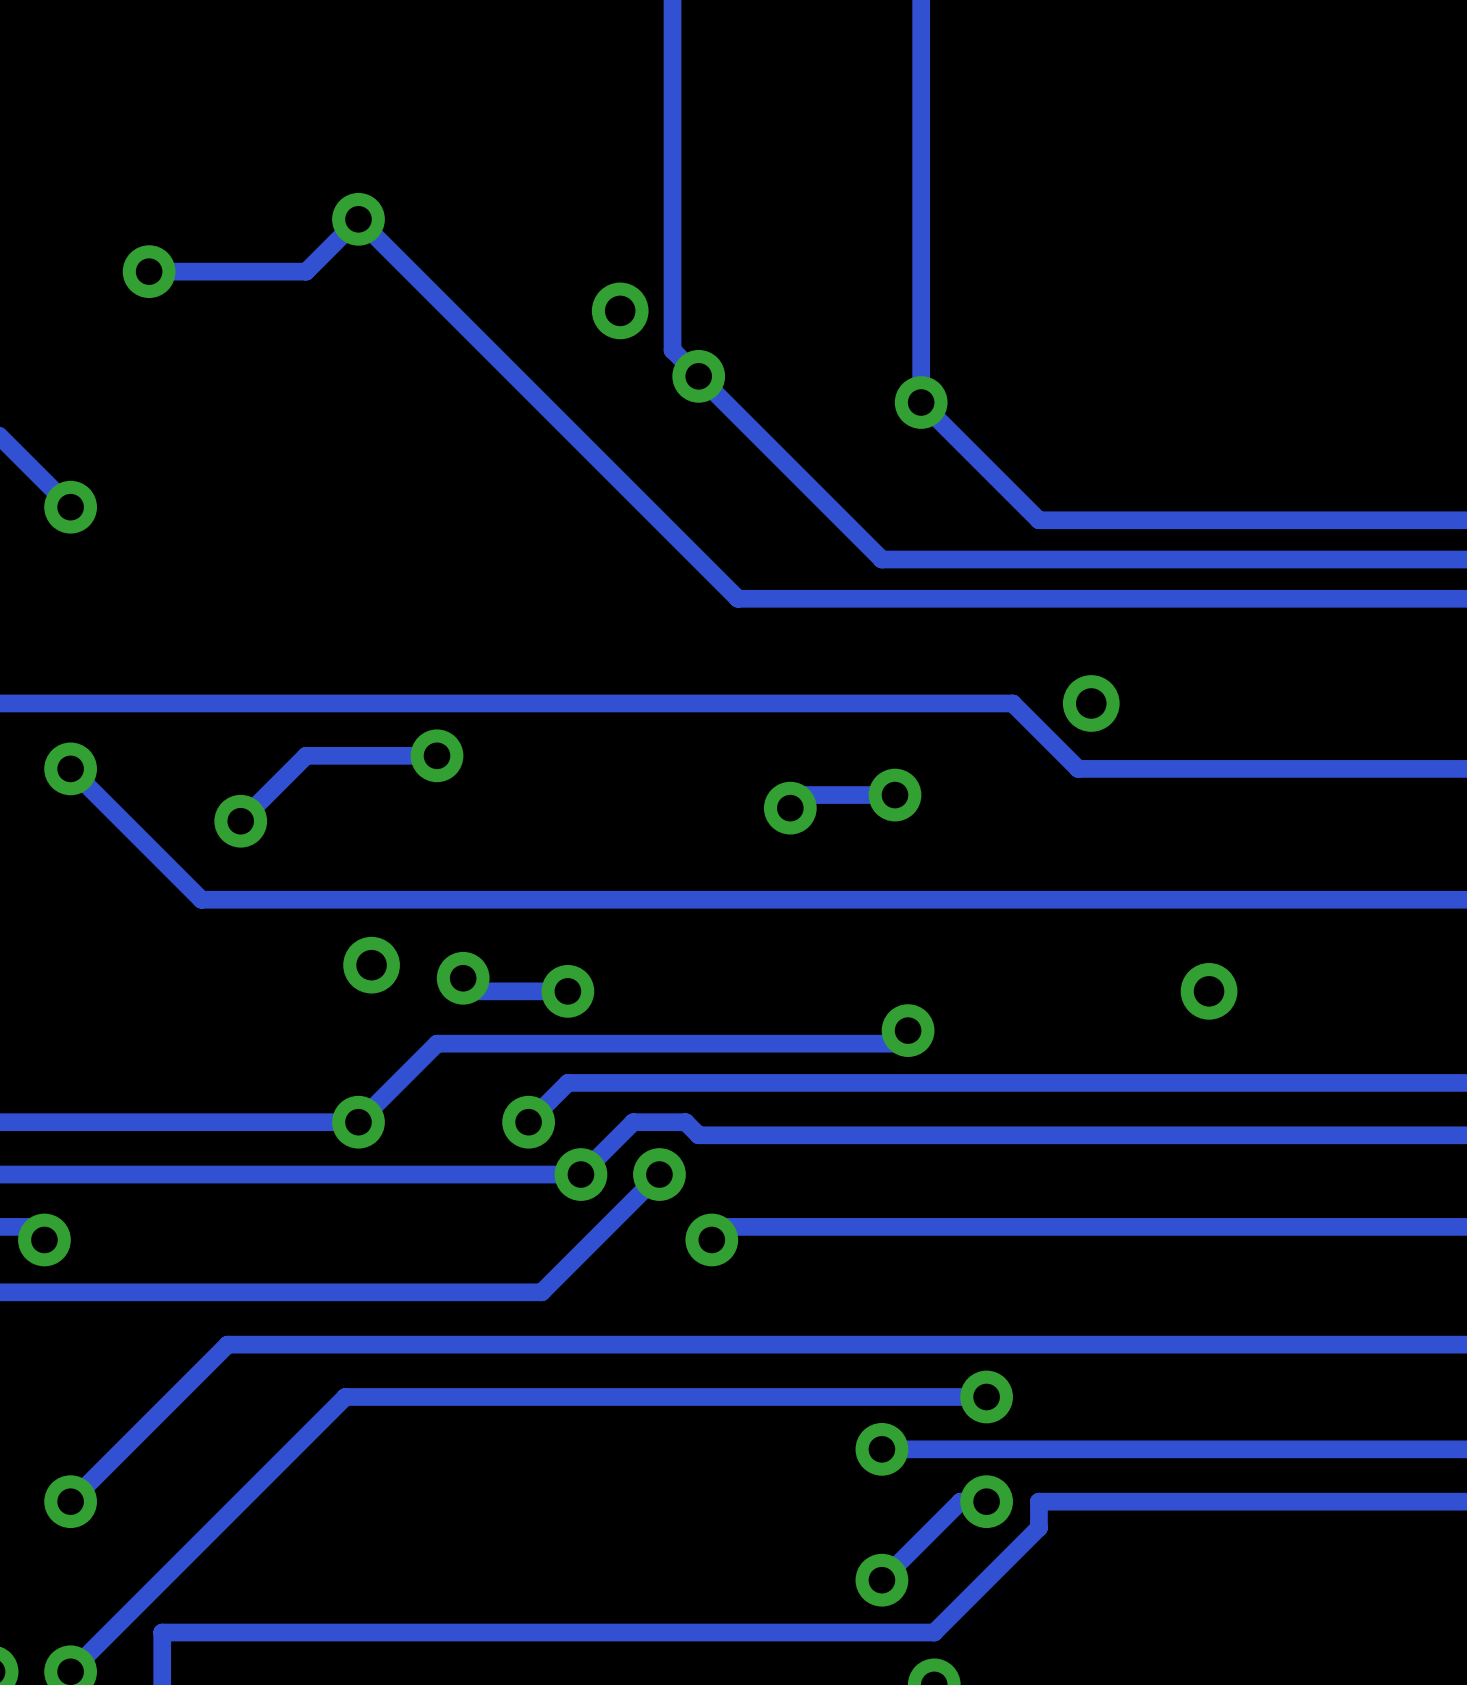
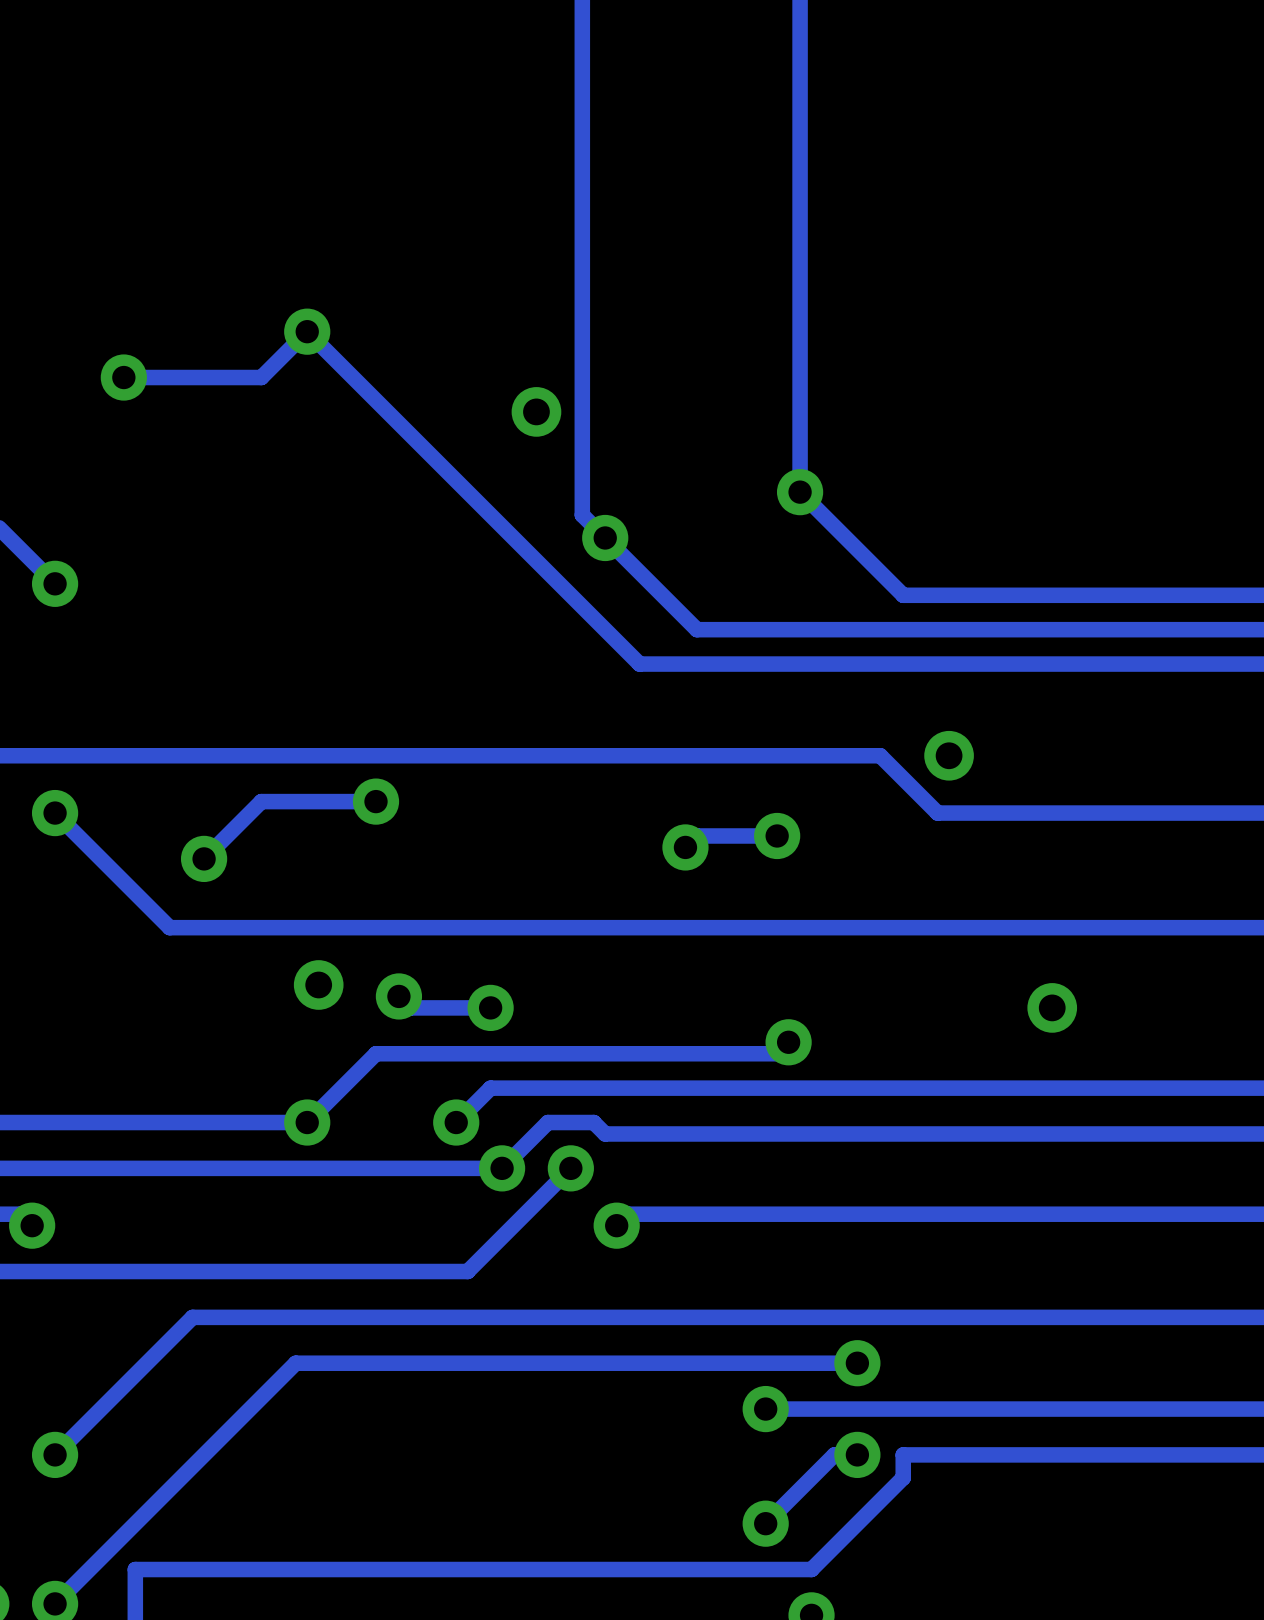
track: (672, 350) (881, 559) -> (582, 446) (582, 515) (696, 629) (765, 629)
via position: (698, 376) -> (605, 537)

